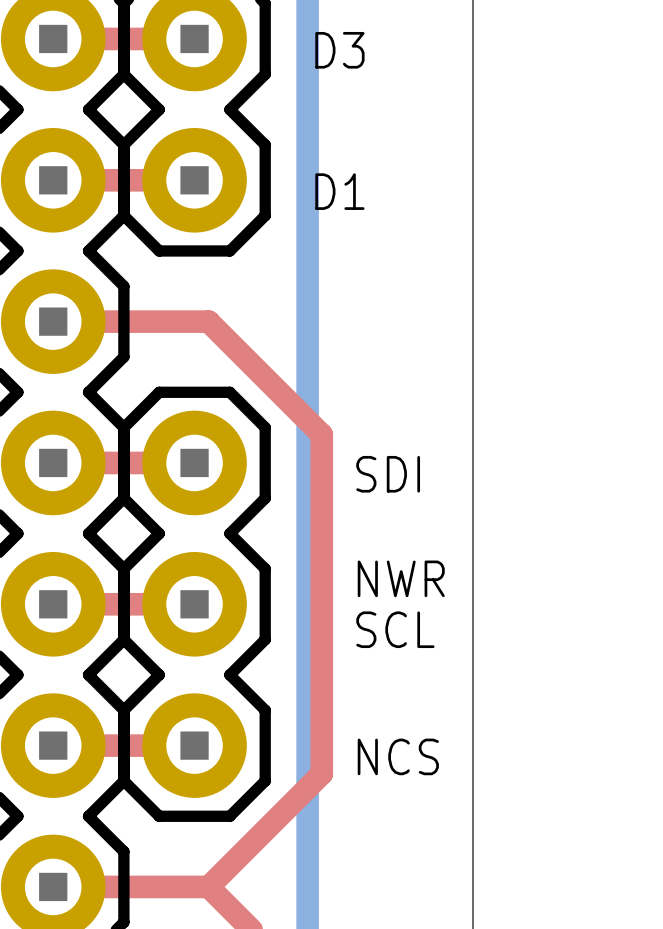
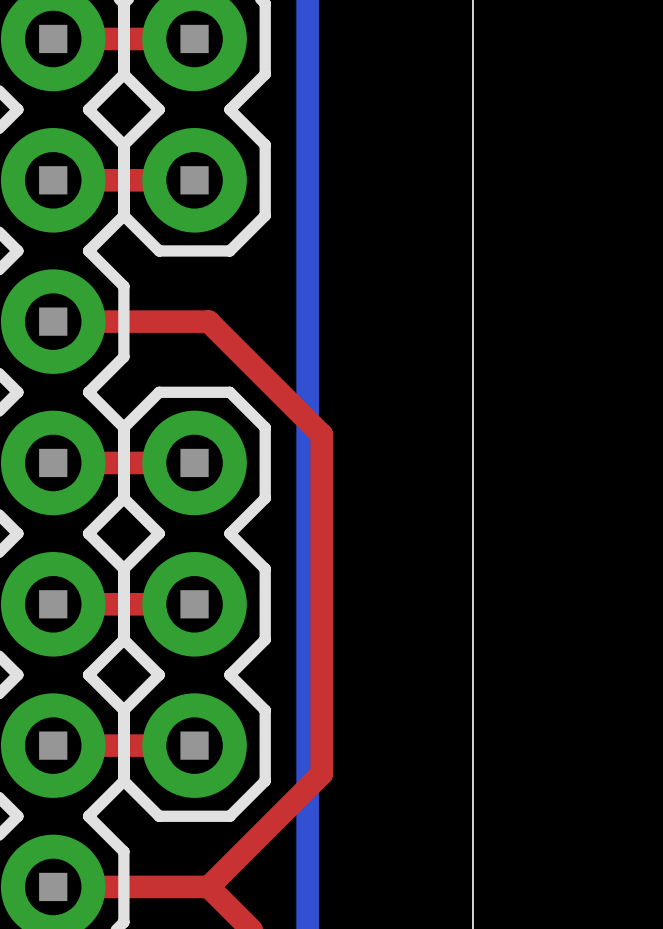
text: D3 (339, 50) -> none
text: D1 (339, 191) -> none
text: SDI (388, 474) -> none
text: NWR (401, 578) -> none
text: SCL (395, 629) -> none
text: NCS (398, 756) -> none

